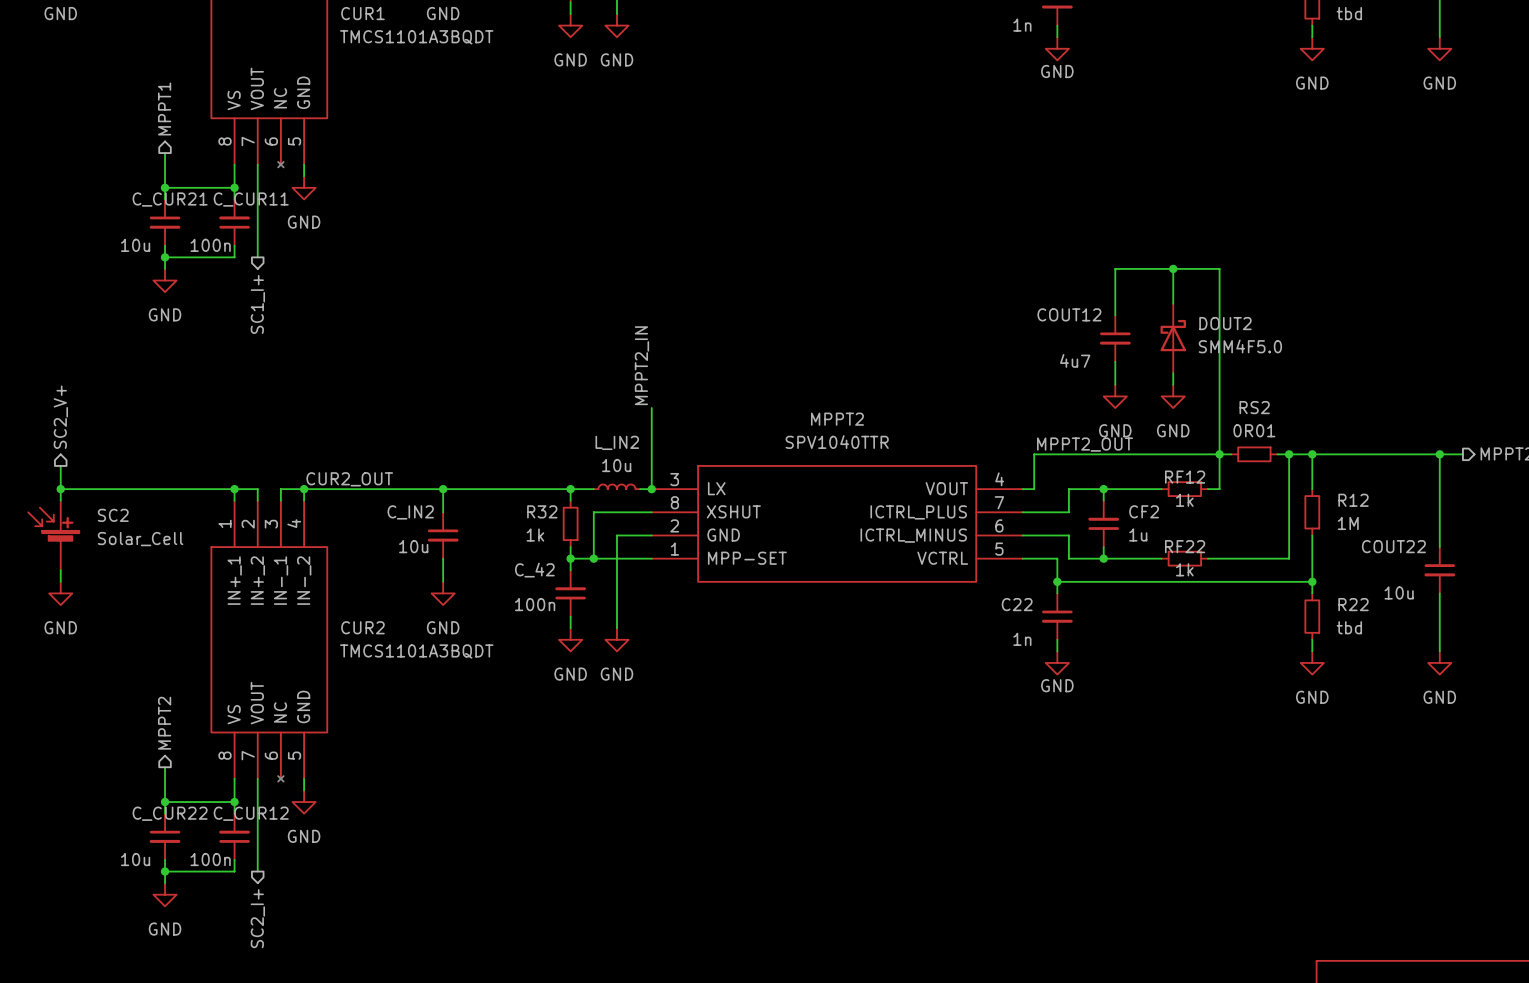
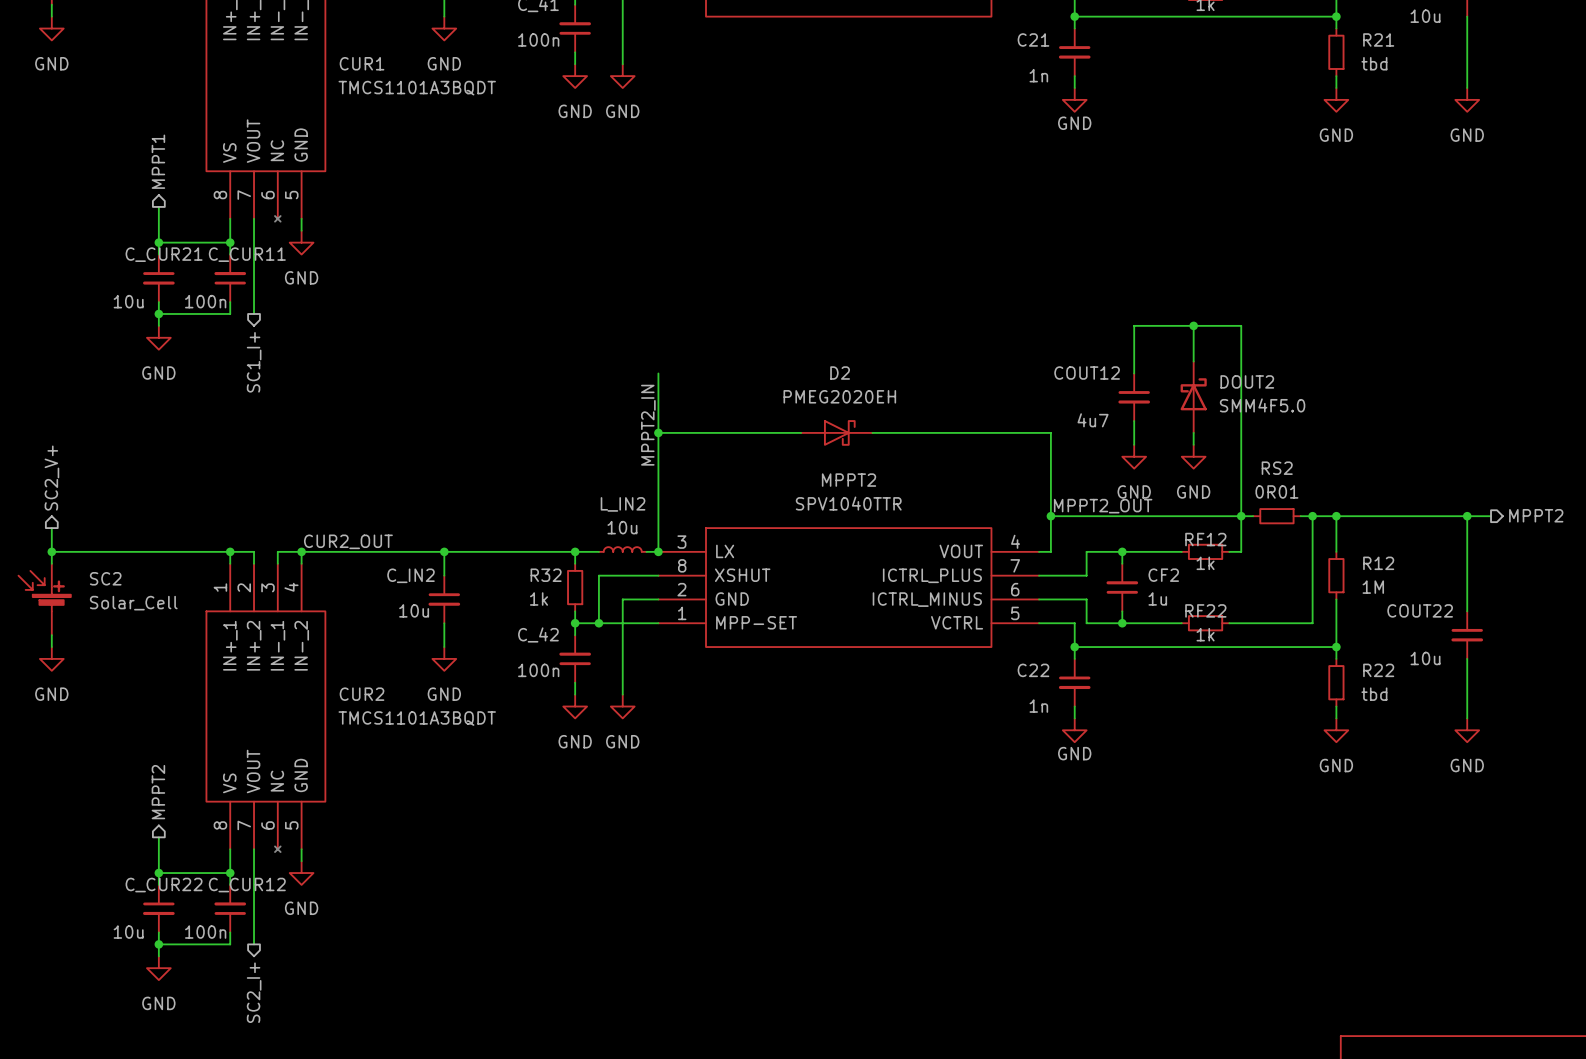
wire: none -> (658, 373) (658, 468)
wire: none -> (658, 432) (801, 432)
junction: none -> (658, 432)
D2: none -> PMEG2020EH (836, 432)
wire: none -> (872, 432) (1050, 432) (1050, 516)
junction: none -> (1050, 516)

